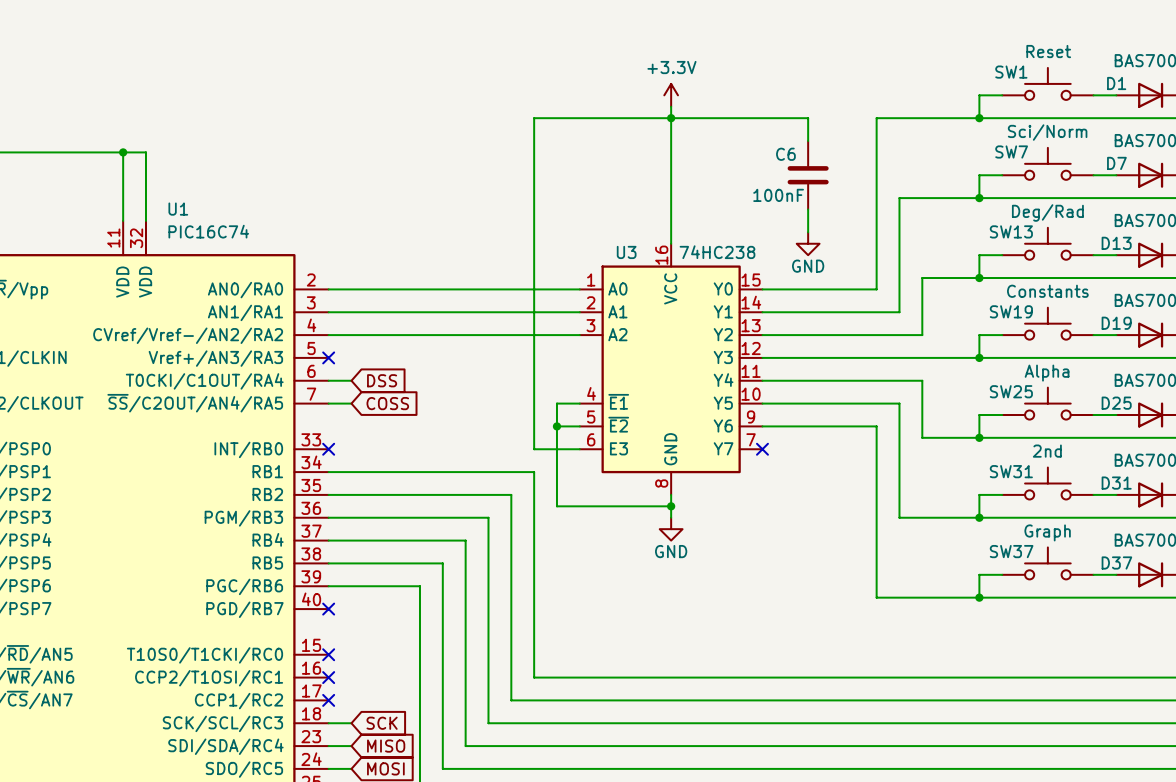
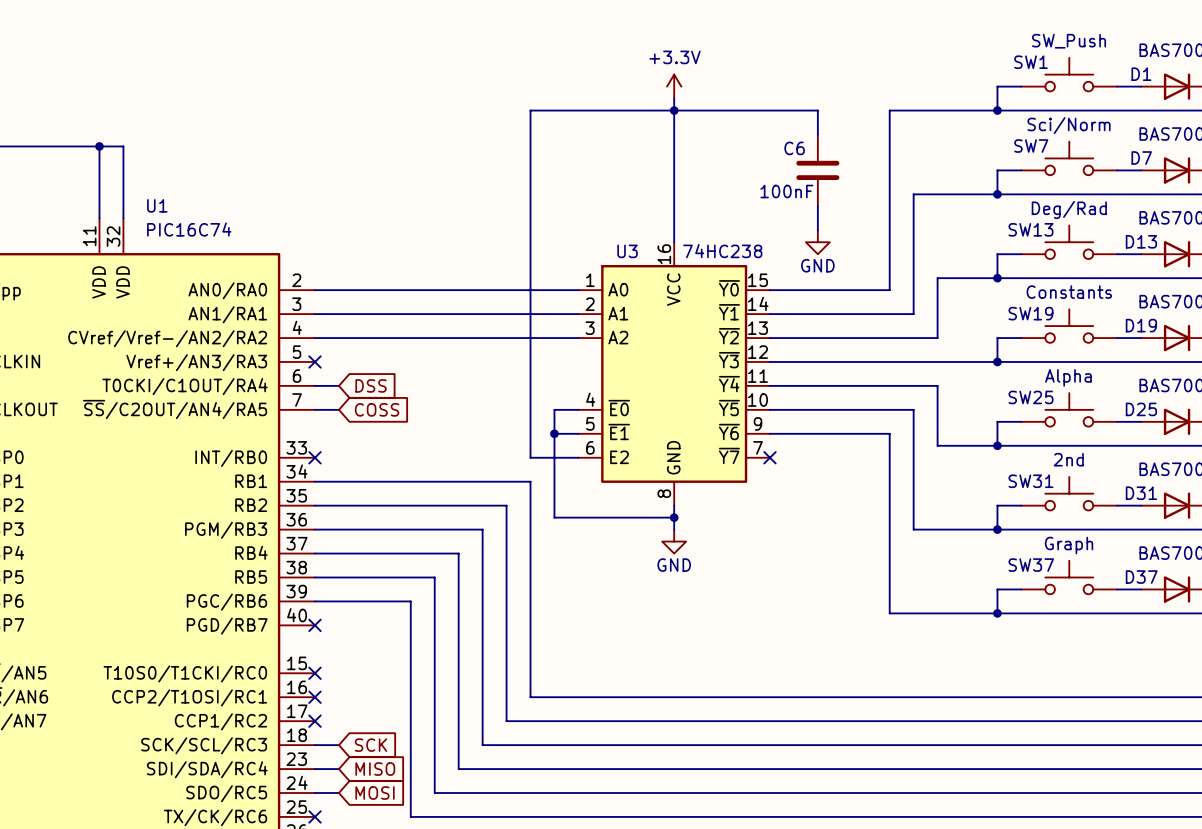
SW1 value: Reset (1048, 51) -> SW_Push (1069, 41)
U3 symbol: [579, 243, 763, 495] -> [578, 242, 770, 506]

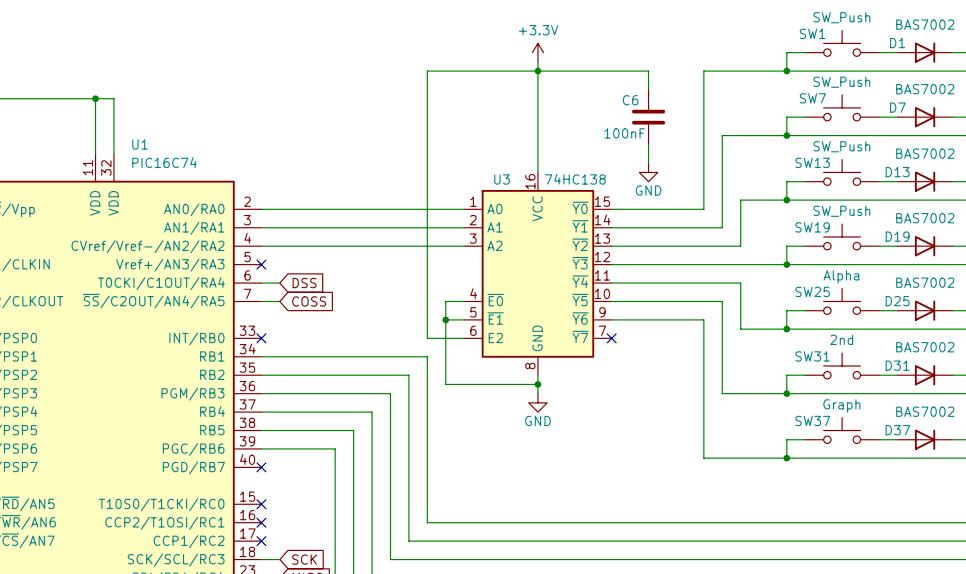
SW7 value: Sci/Norm (1069, 125) -> SW_Push (841, 82)
SW13 value: Deg/Rad (1069, 209) -> SW_Push (841, 146)
U3 value: 74HC238 (722, 251) -> 74HC138 (575, 179)
SW19 value: Constants (1069, 292) -> SW_Push (841, 211)

